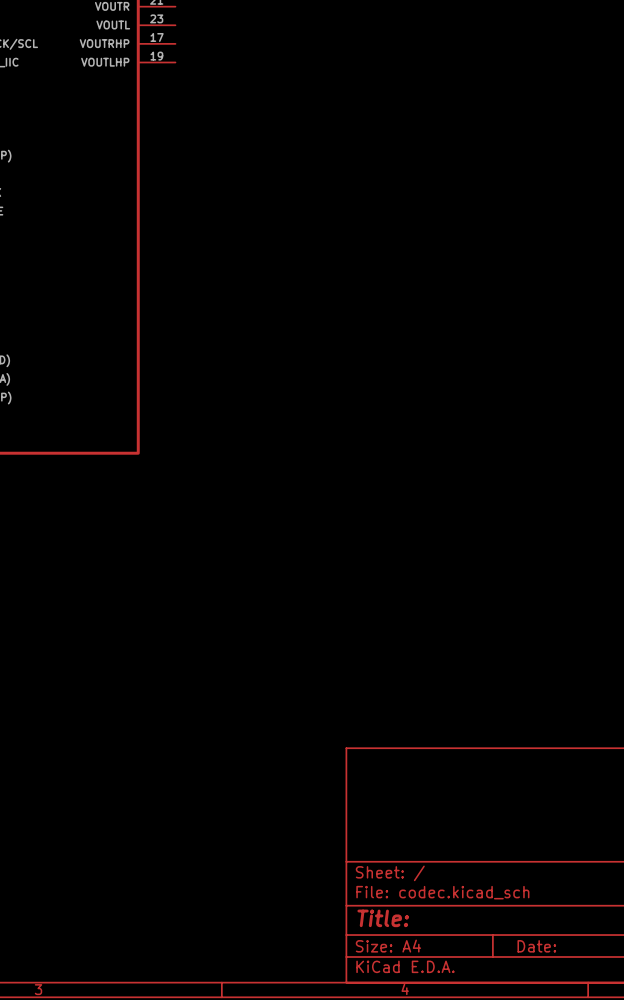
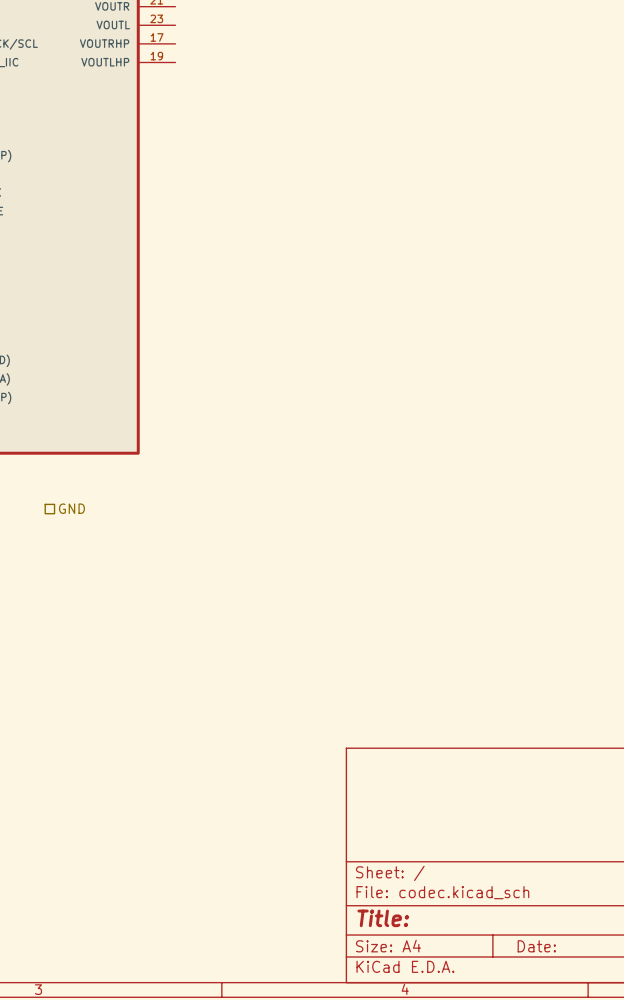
hierarchical label: none -> GND (71, 508)

